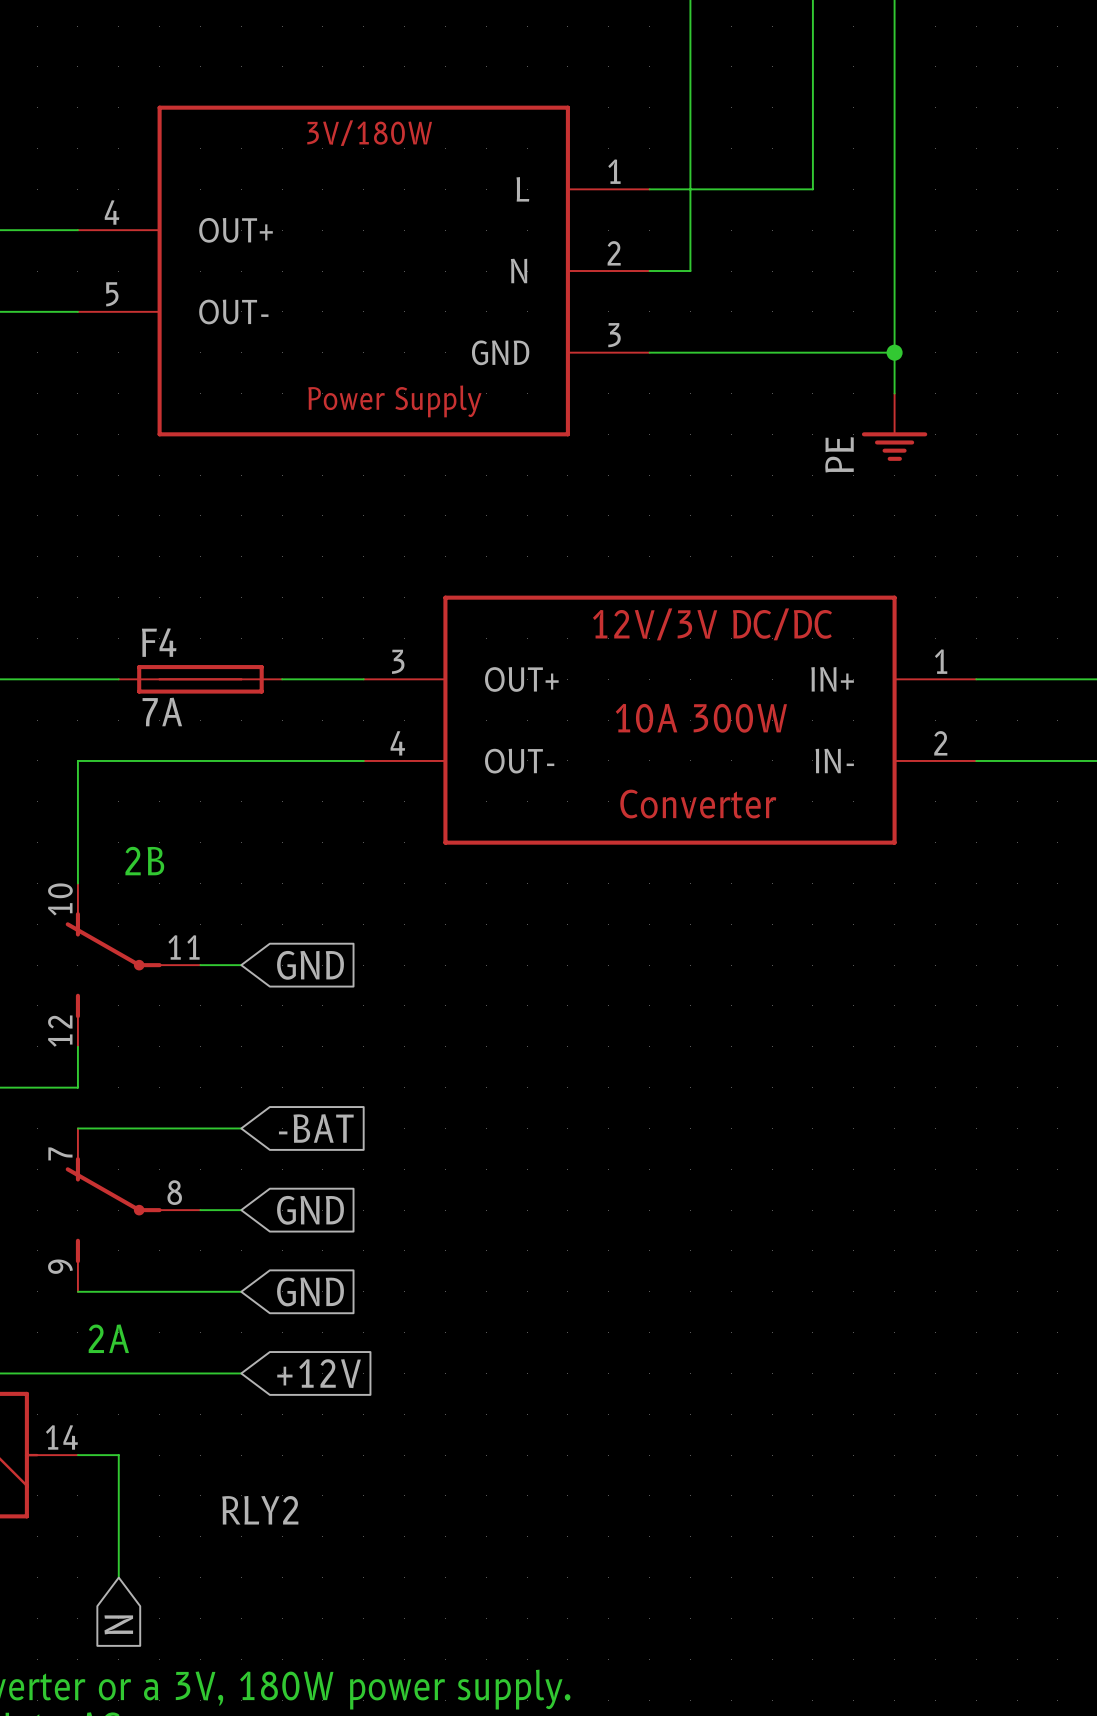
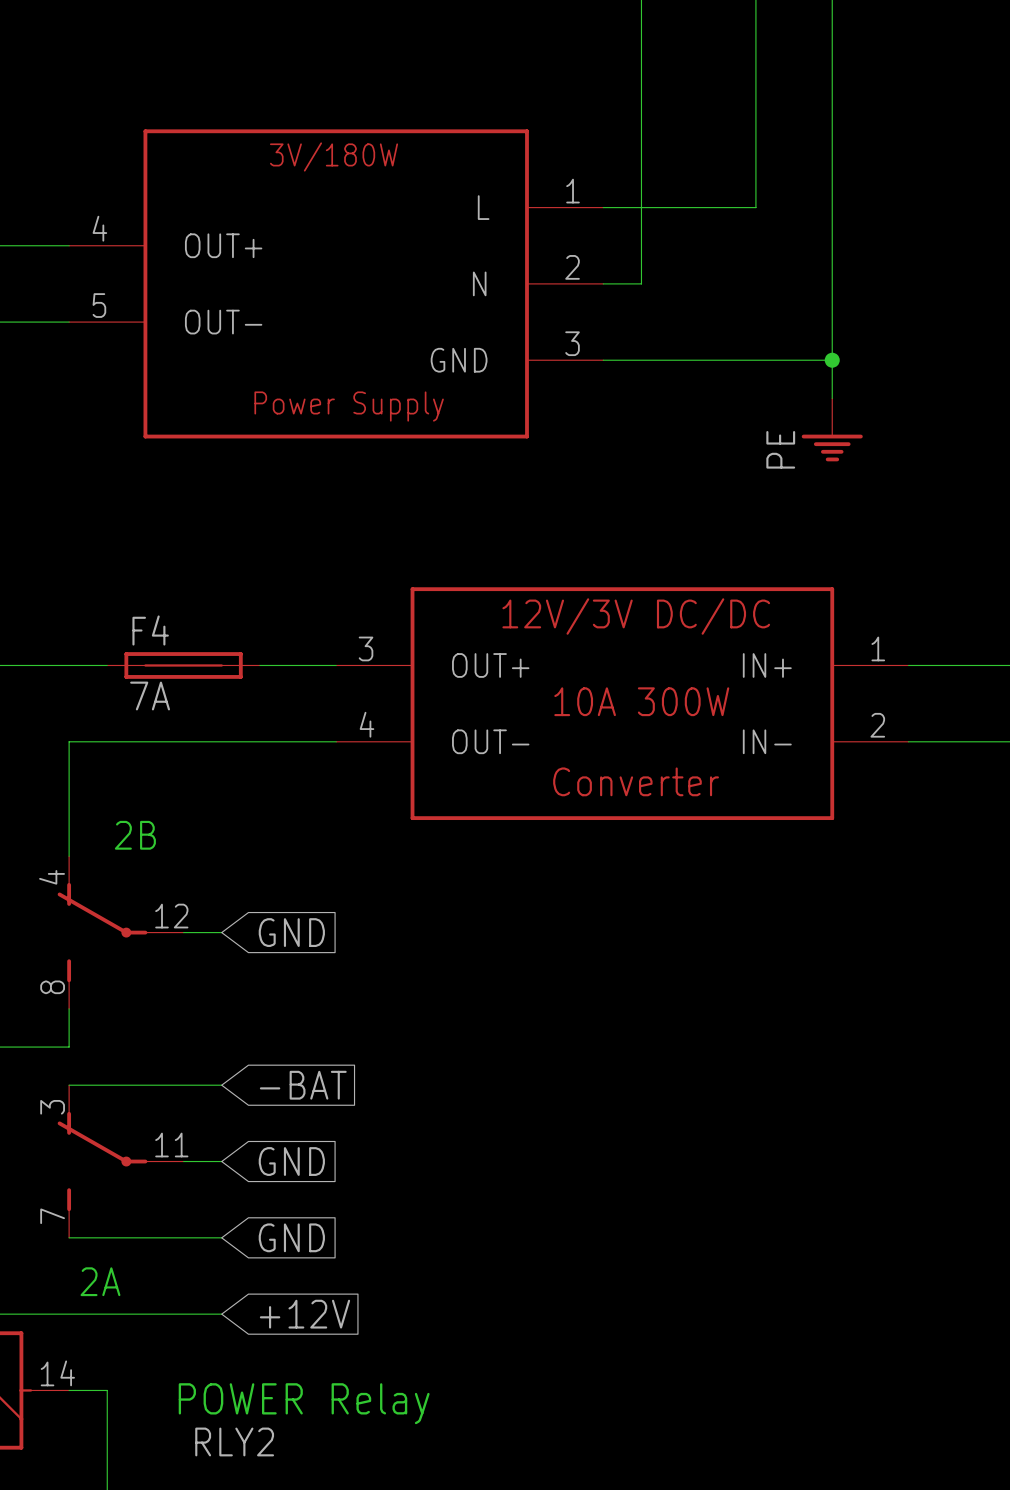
part pin number: 10 (60, 899) -> 4 (52, 877)
part pin number: 11 (184, 947) -> 12 (171, 916)
part pin number: 12 (60, 1031) -> 8 (52, 987)
part pin number: 7 (60, 1153) -> 3 (52, 1107)
part pin number: 8 (174, 1192) -> 11 (171, 1144)
part pin number: 9 (60, 1266) -> 7 (52, 1216)
text: none -> POWER Relay (304, 1403)

